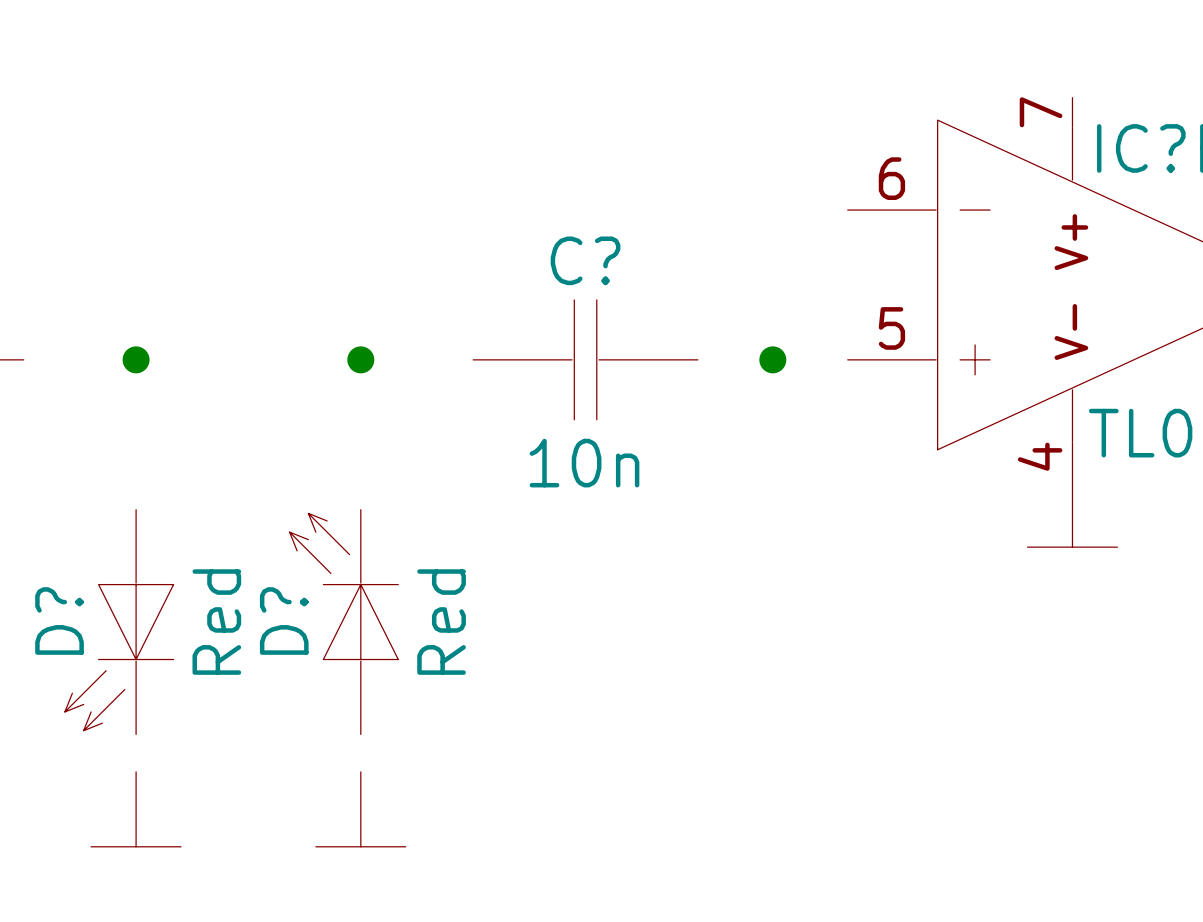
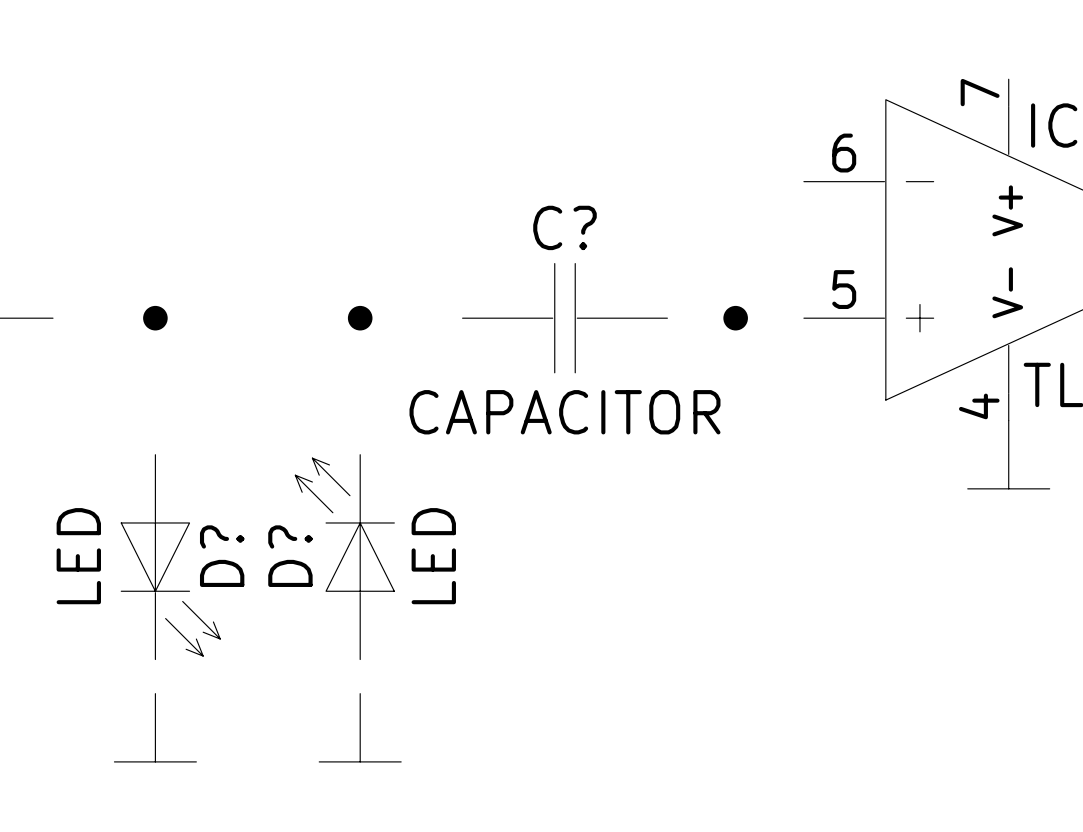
C? value: 10n (584, 463) -> CAPACITOR (564, 412)
D?: Red (119, 622) -> none
D?: none -> LED (170, 557)
D? value: Red (441, 622) -> LED (433, 556)

